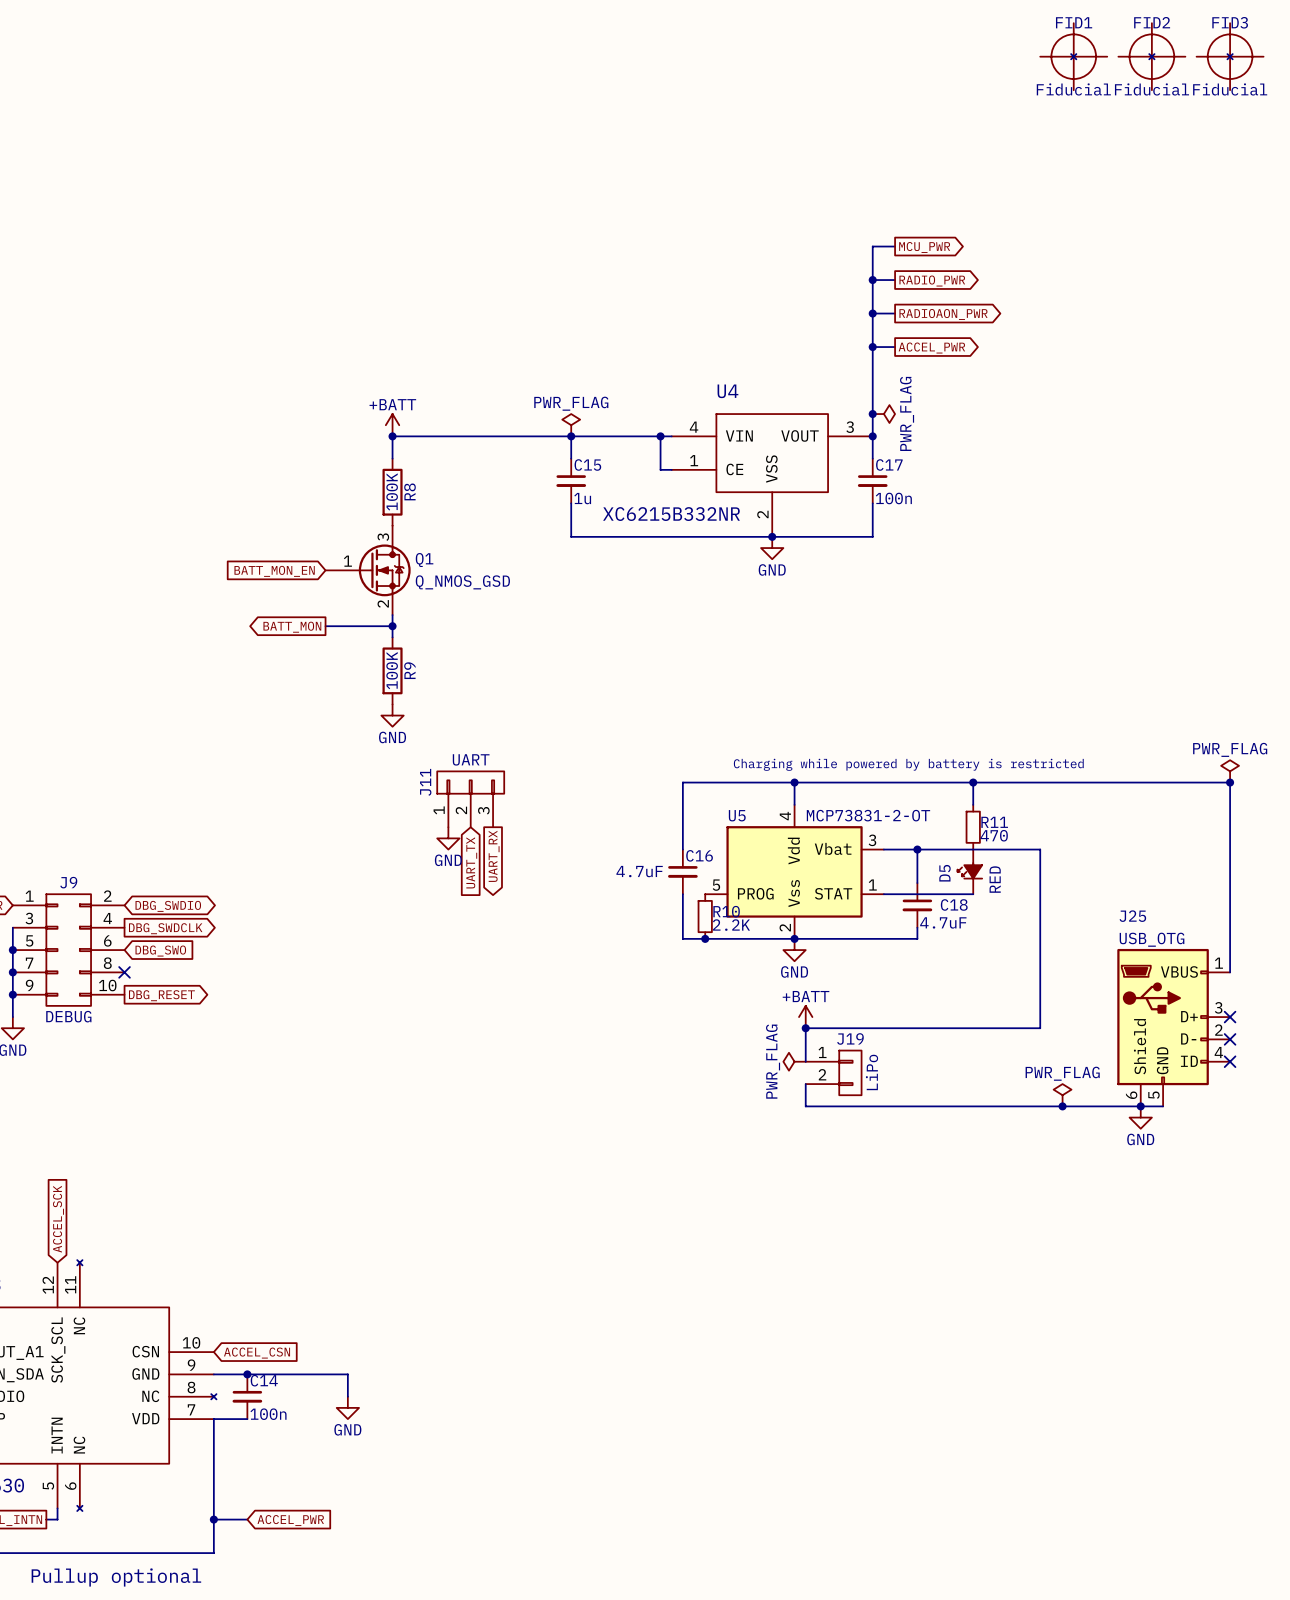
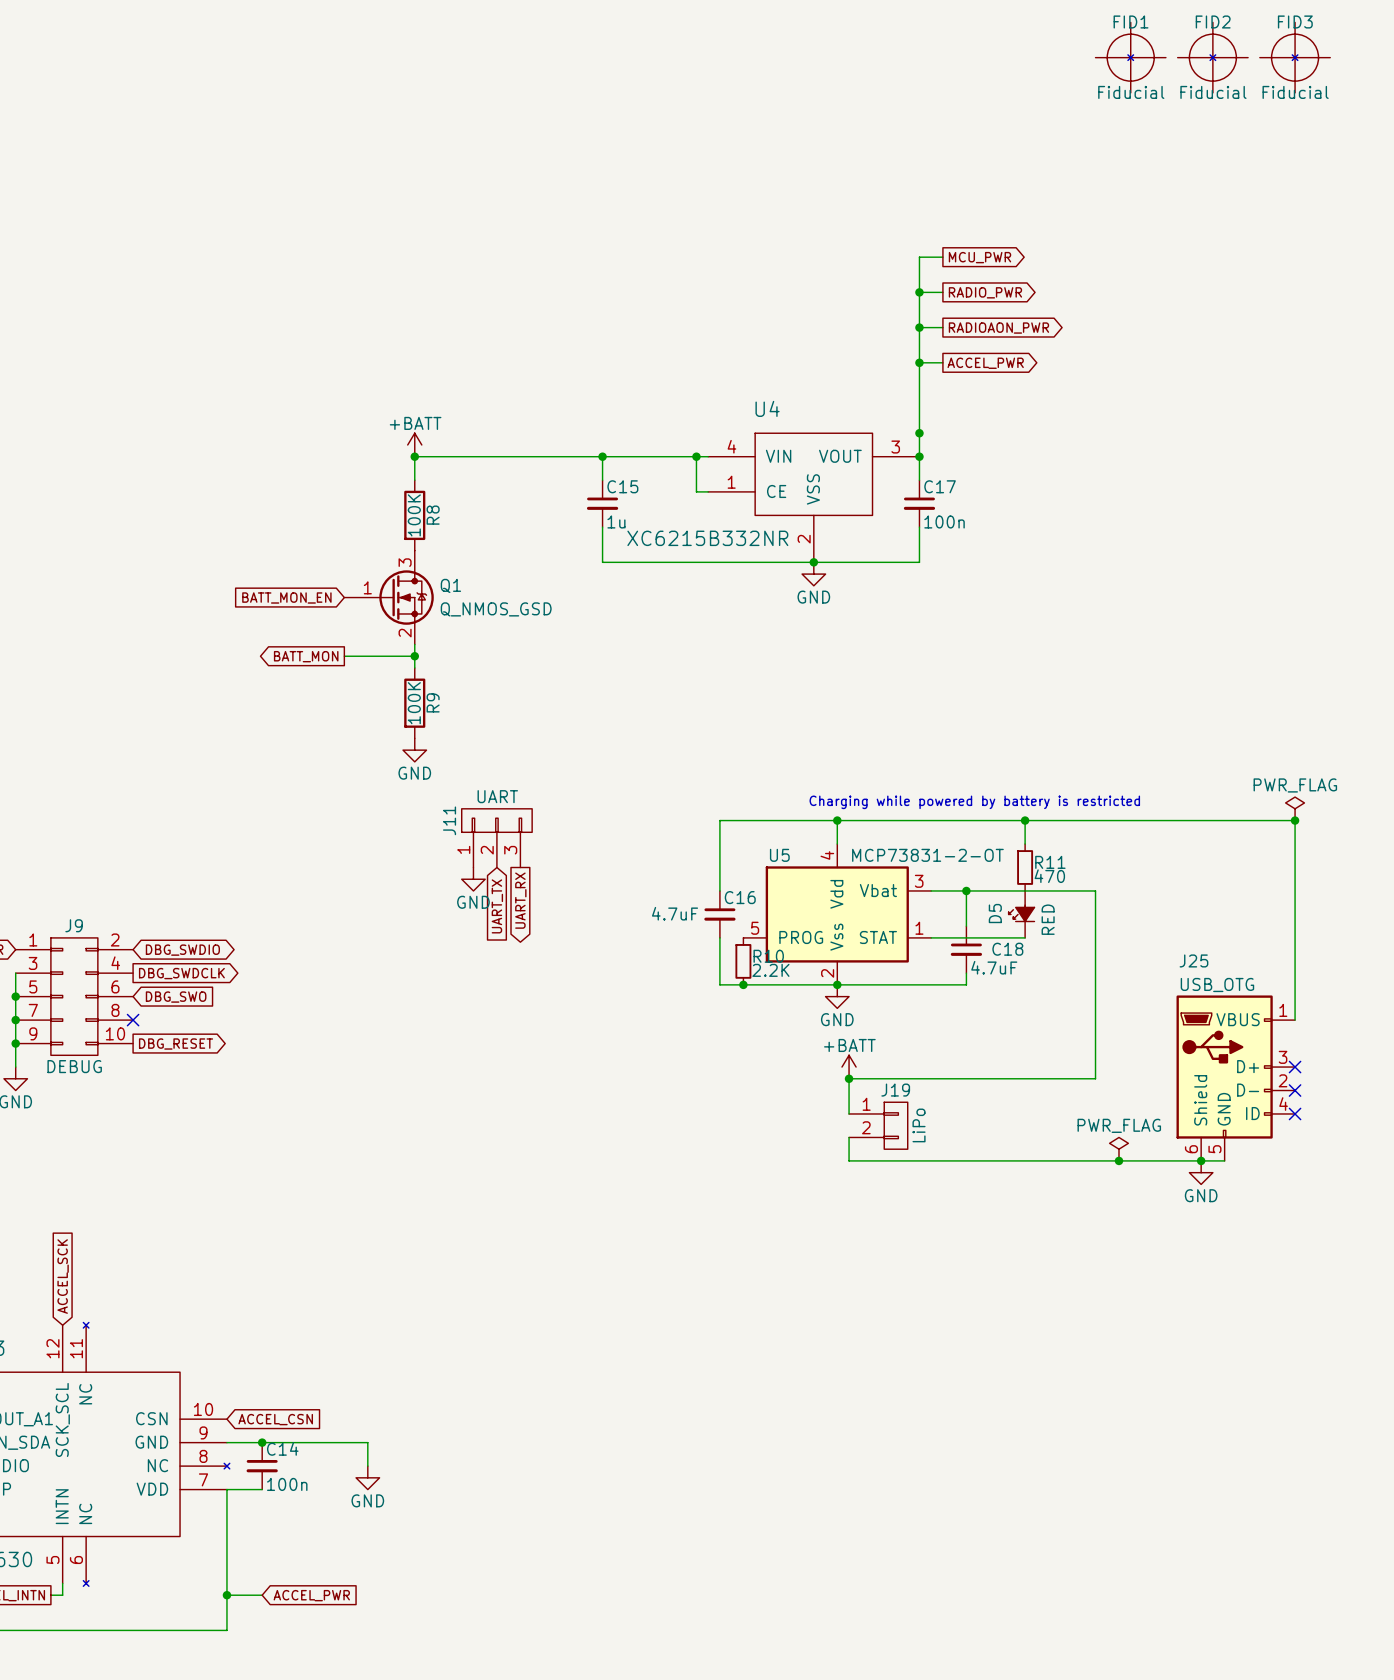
power symbol: PWR_FLAG (883, 414) -> none
power symbol: PWR_FLAG (571, 425) -> none
power symbol: PWR_FLAG (794, 1061) -> none
text: Pullup optional (116, 1577) -> none

